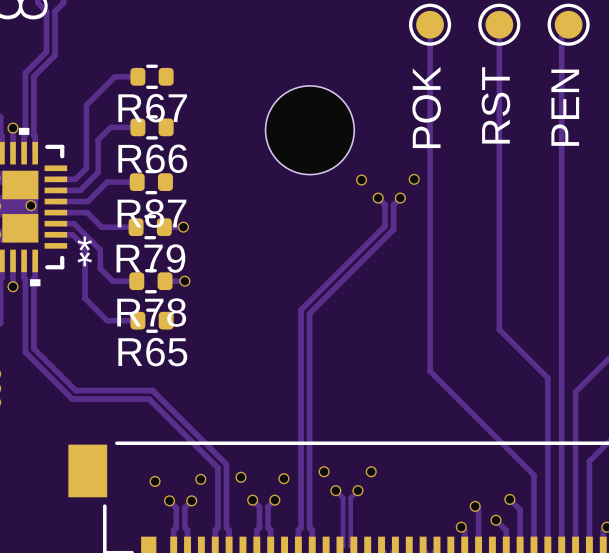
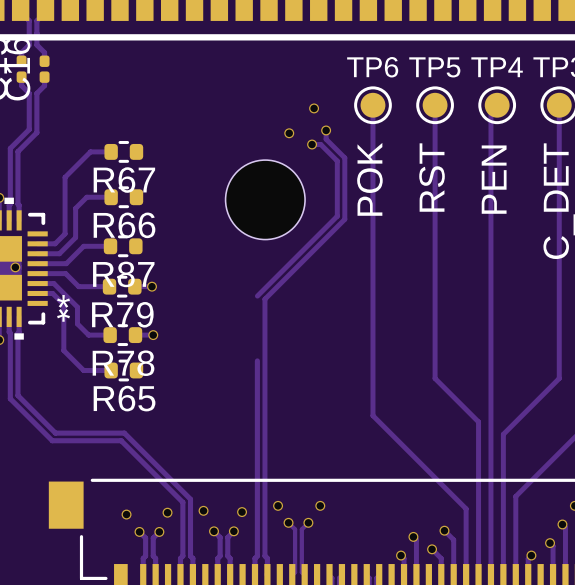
via: none -> (314, 108)
track: none -> (326, 130) (326, 139) (344, 157) (344, 219) (264, 299) (264, 555) (267, 558)
via: none -> (326, 130)
via: none -> (289, 133)
track: none -> (312, 144) (320, 144) (337, 161) (337, 216) (257, 296)
via: none -> (312, 144)
via: (414, 179) -> none
via: (361, 180) -> none
track: (378, 198) (385, 204) (385, 226) (301, 310) -> none
via: (378, 198) -> none
track: (400, 198) (393, 204) (393, 229) (309, 313) (309, 527) -> none
via: (400, 198) -> none

